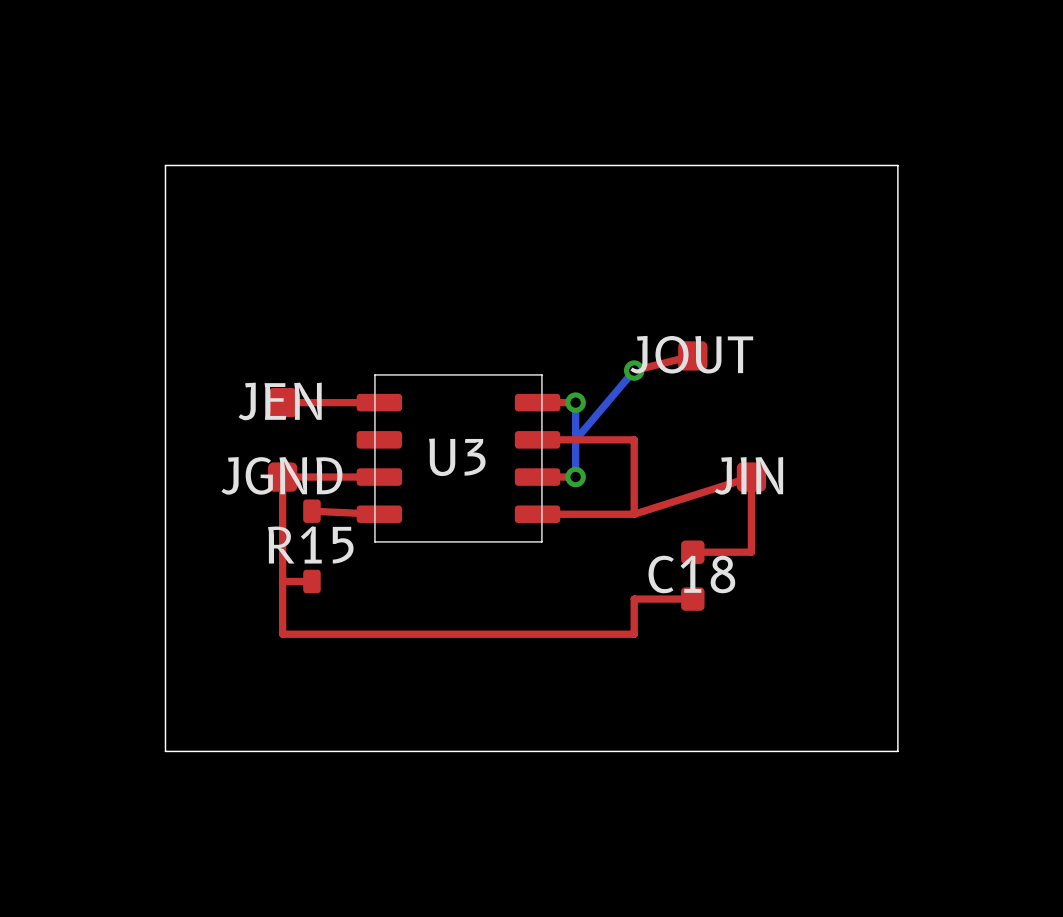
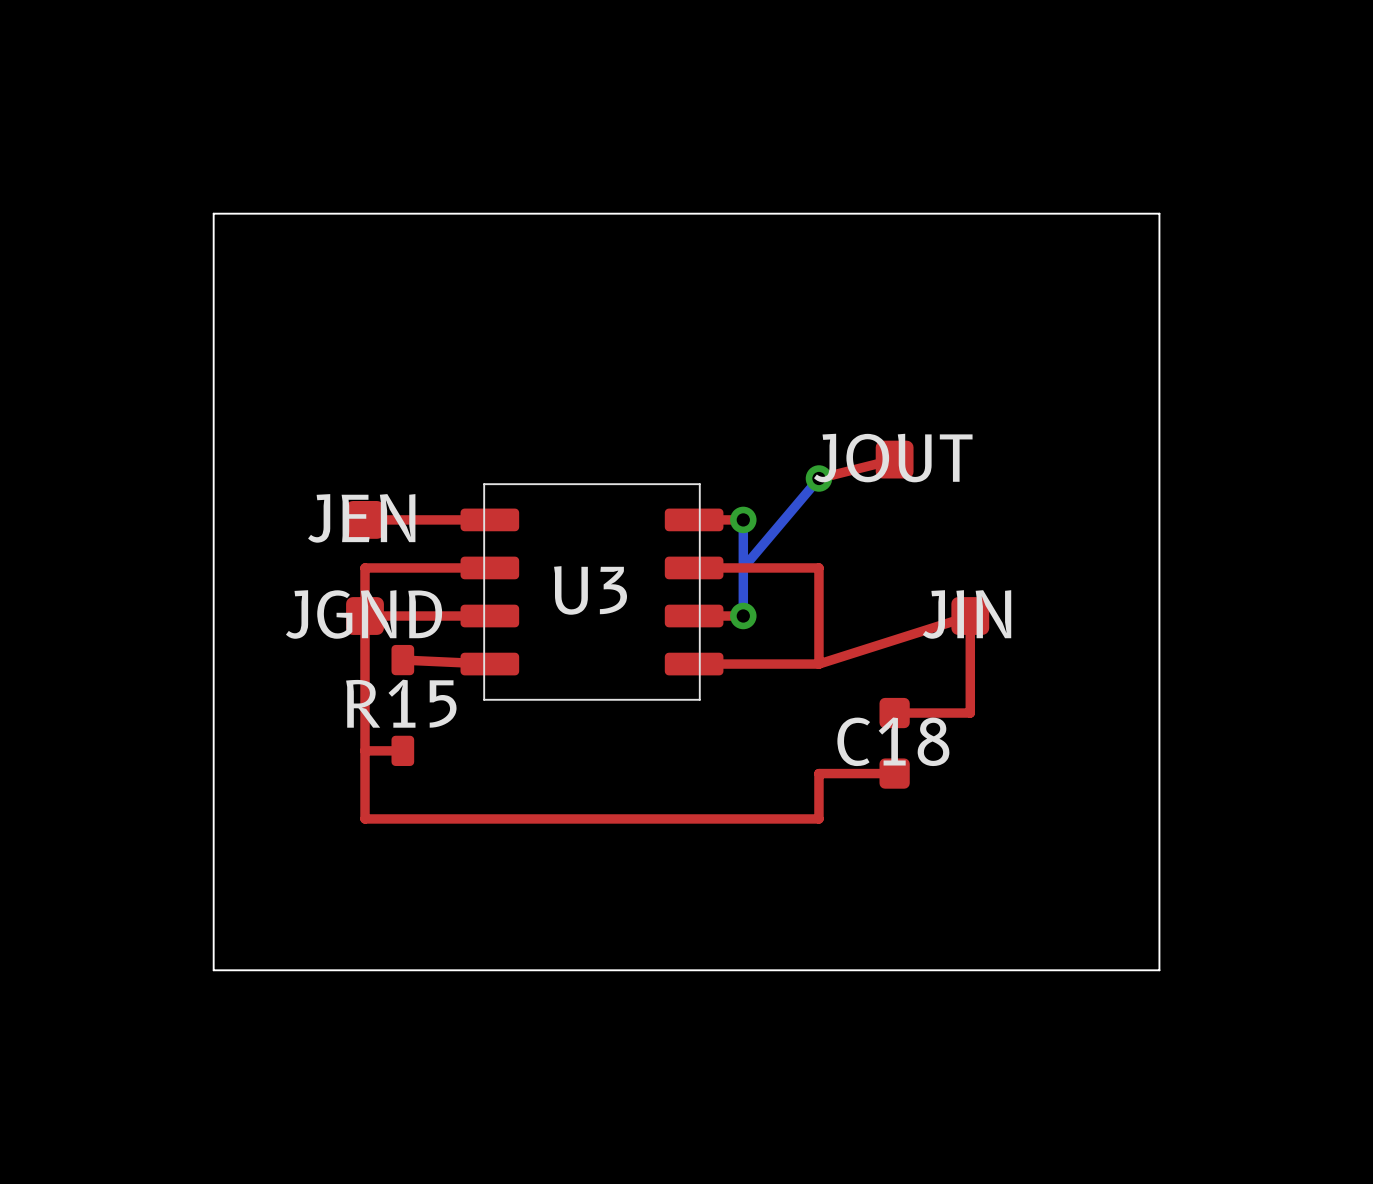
top track: none -> (489, 567) (365, 567) (365, 616)

